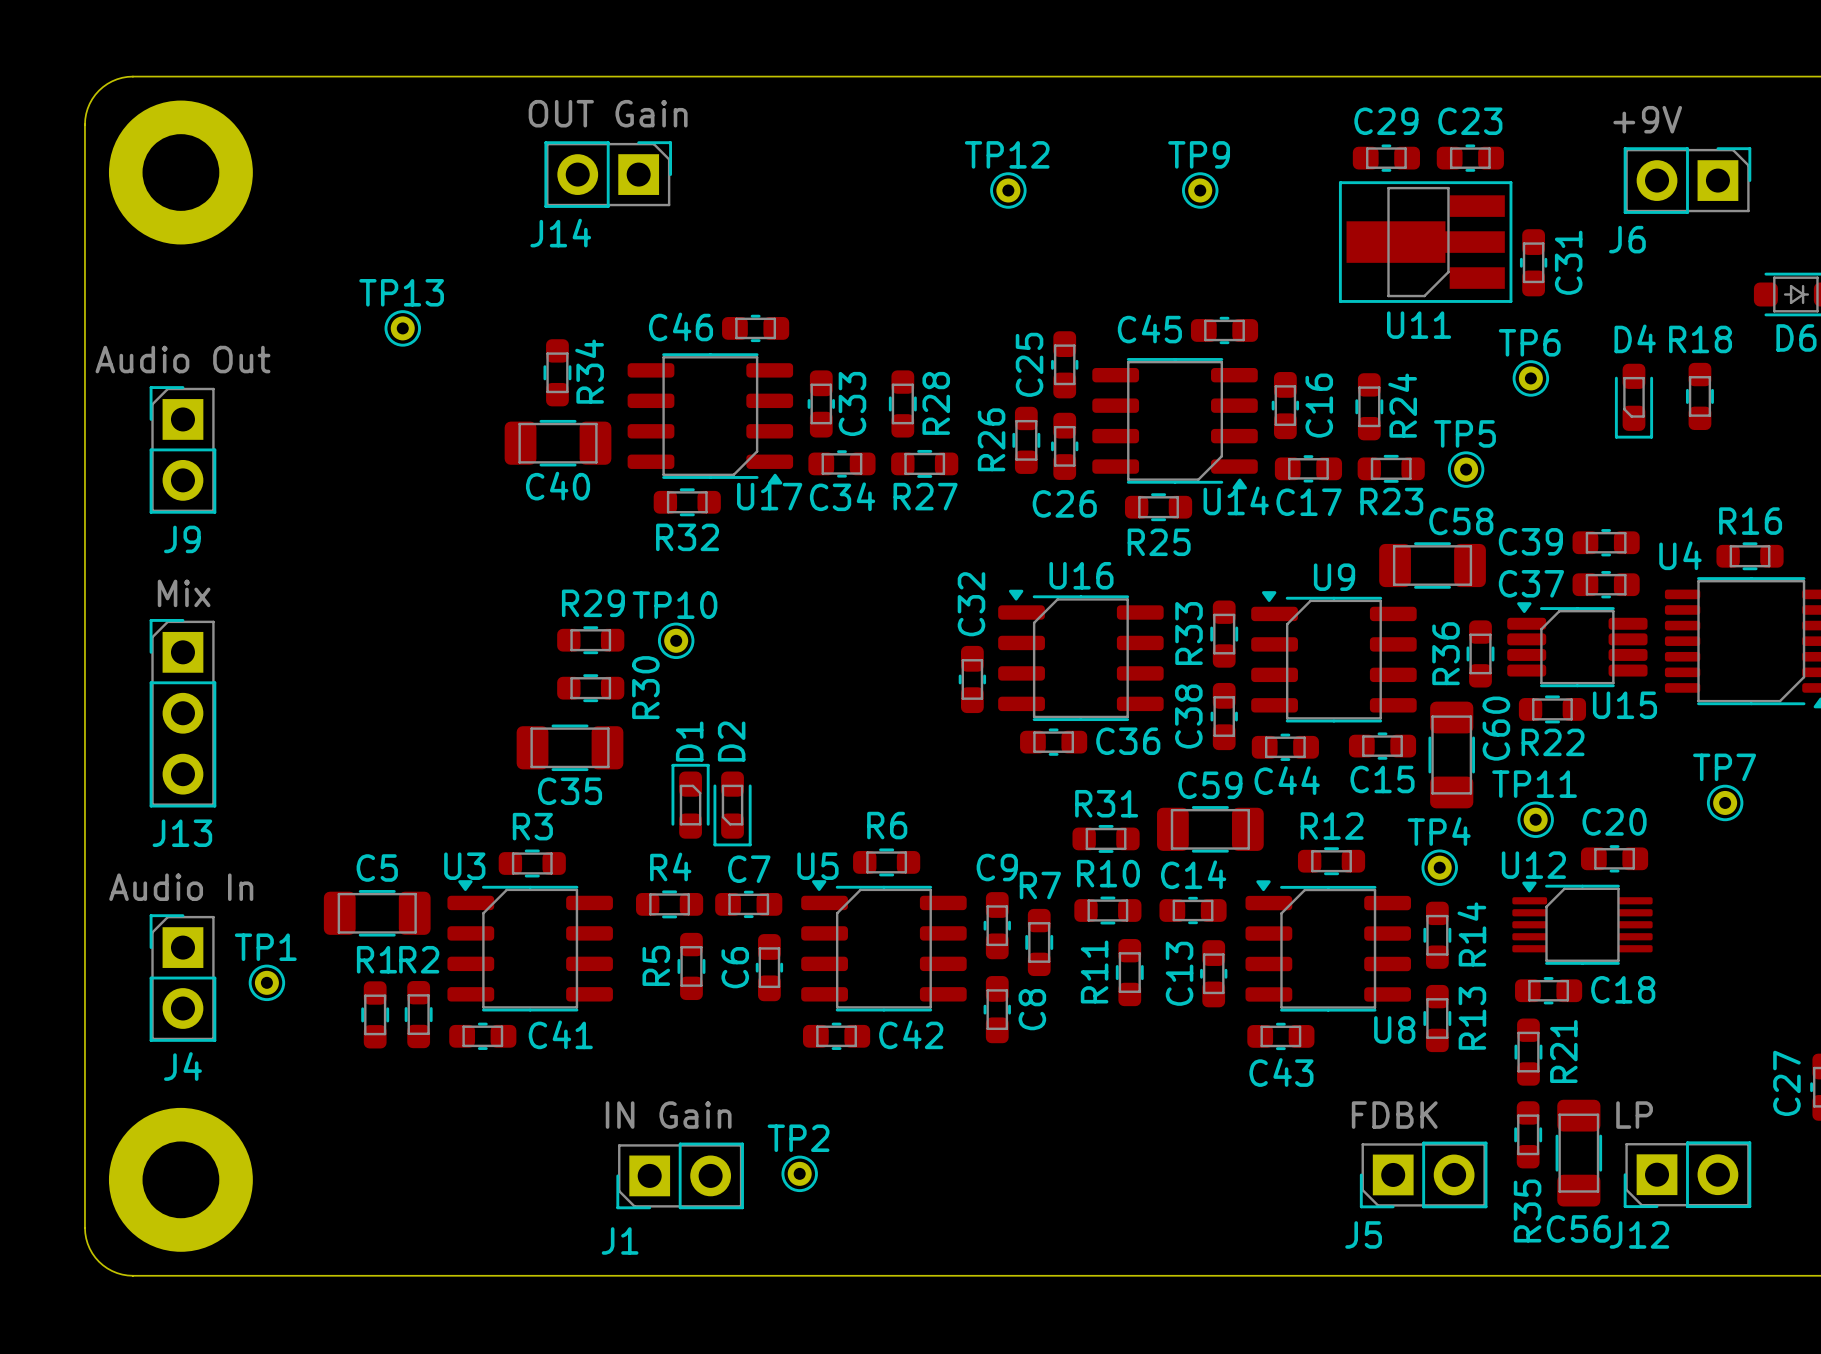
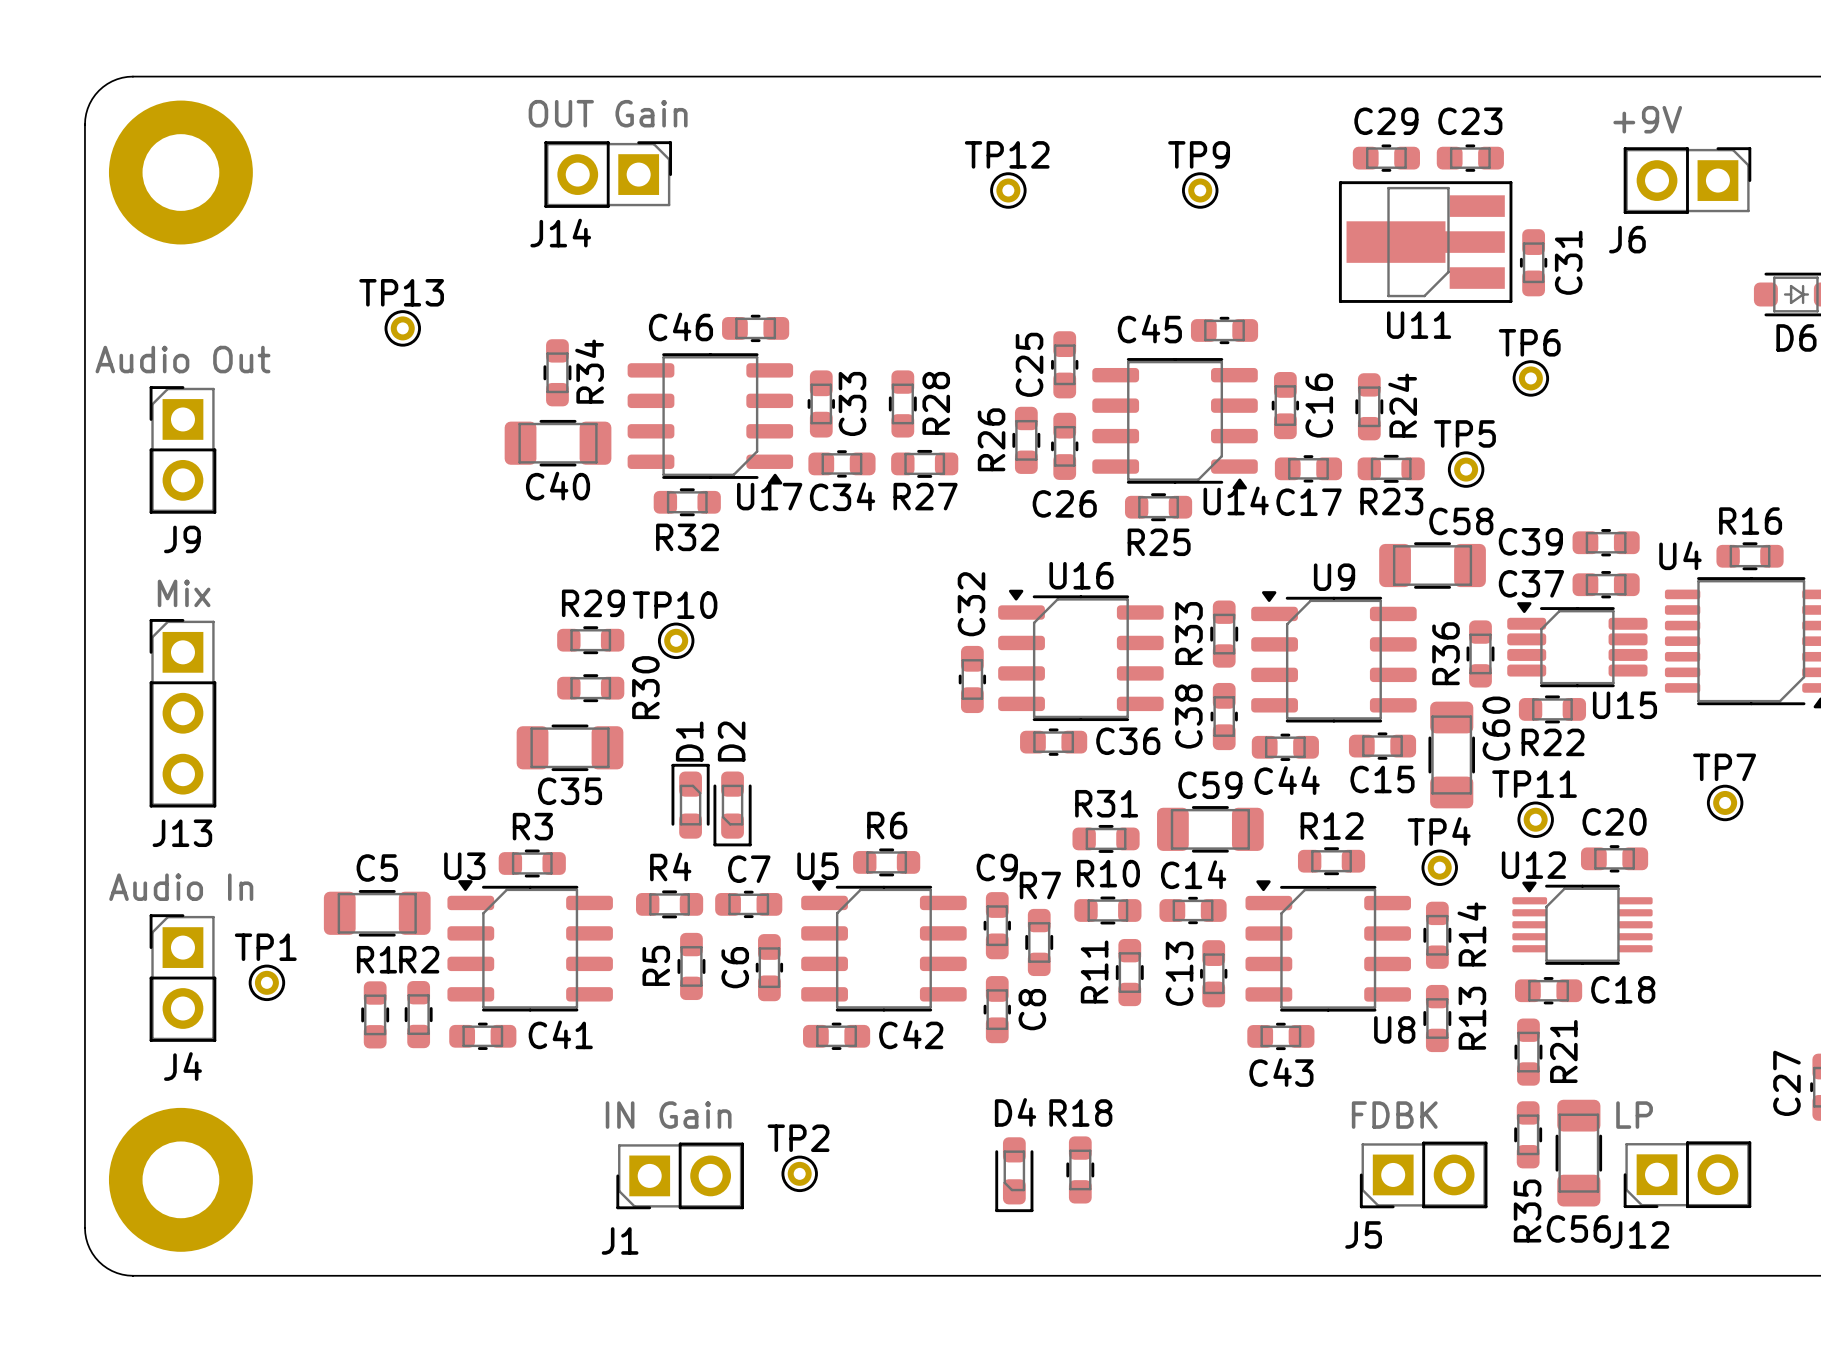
R18 position: (1699, 396) -> (1080, 1169)
D4 position: (1634, 401) -> (1014, 1174)

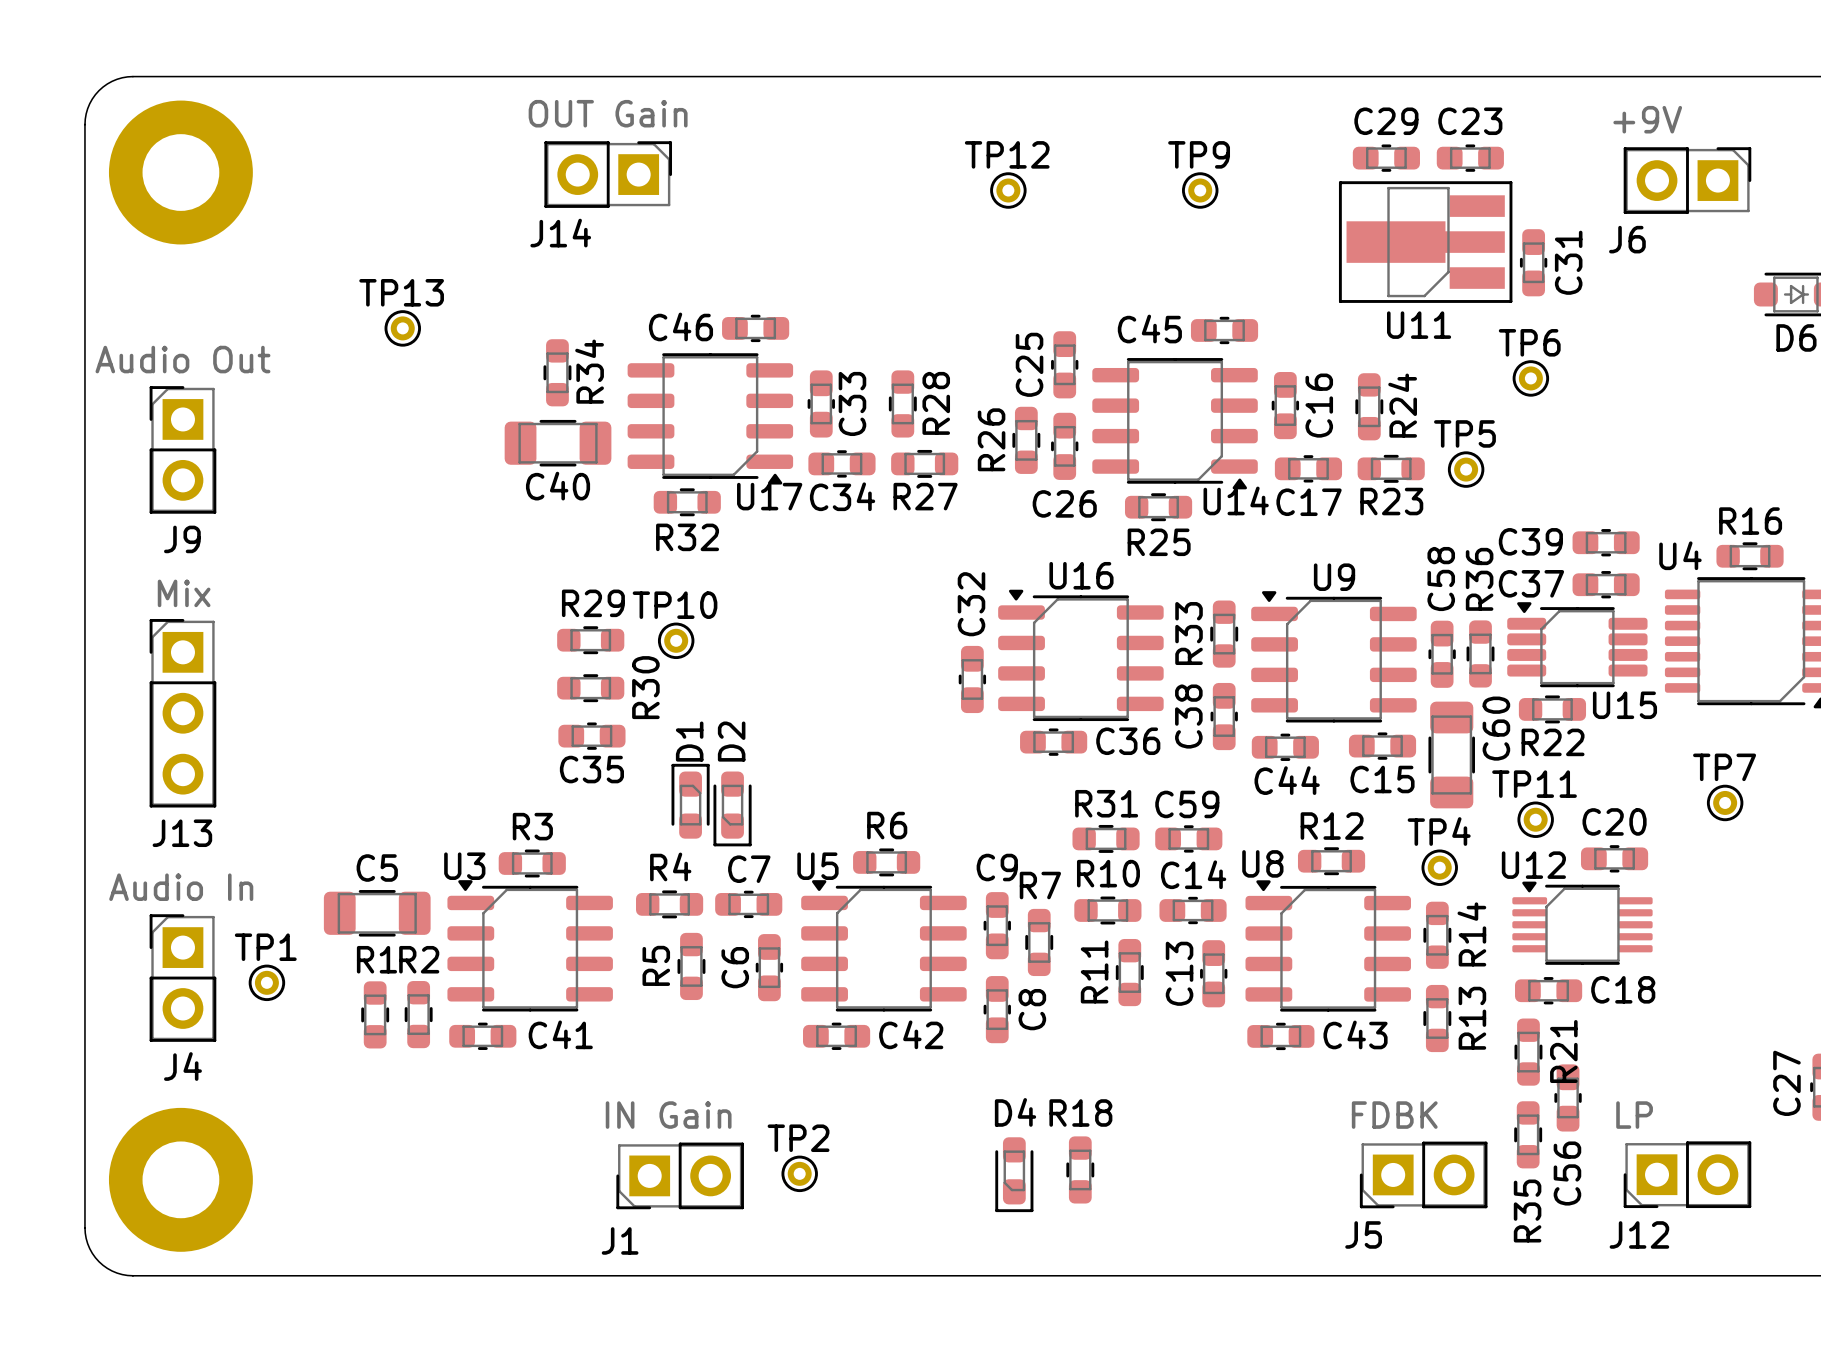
C58 footprint: [1379, 542, 1486, 589] -> [1428, 620, 1456, 688]
R36 name position: R36 (1446, 653) -> R36 (1479, 579)
C35 footprint: [516, 724, 624, 772] -> [558, 722, 626, 750]
C59 footprint: [1157, 806, 1264, 853] -> [1155, 825, 1223, 853]
U8 name position: U8 (1394, 1029) -> U8 (1262, 863)
C43 name position: C43 (1281, 1072) -> C43 (1355, 1034)
C56 footprint: [1555, 1099, 1603, 1207] -> [1554, 1064, 1582, 1132]

